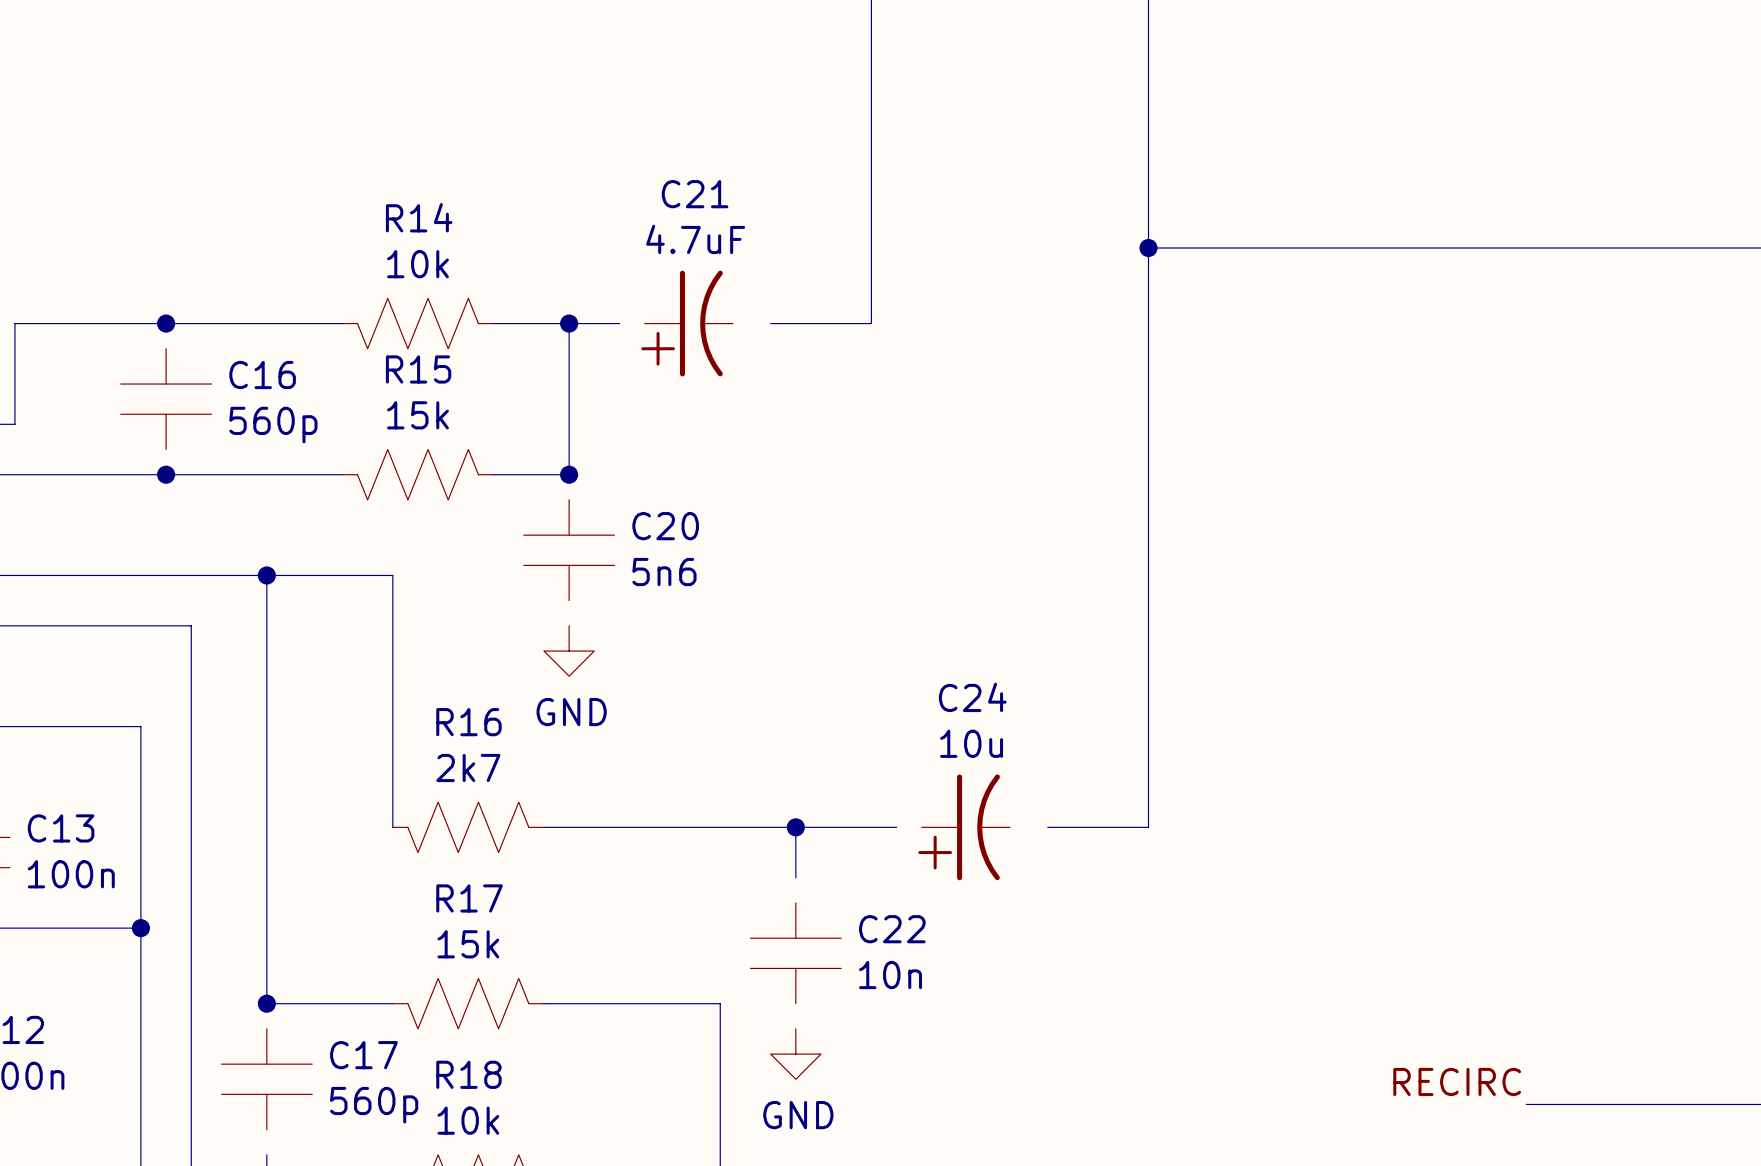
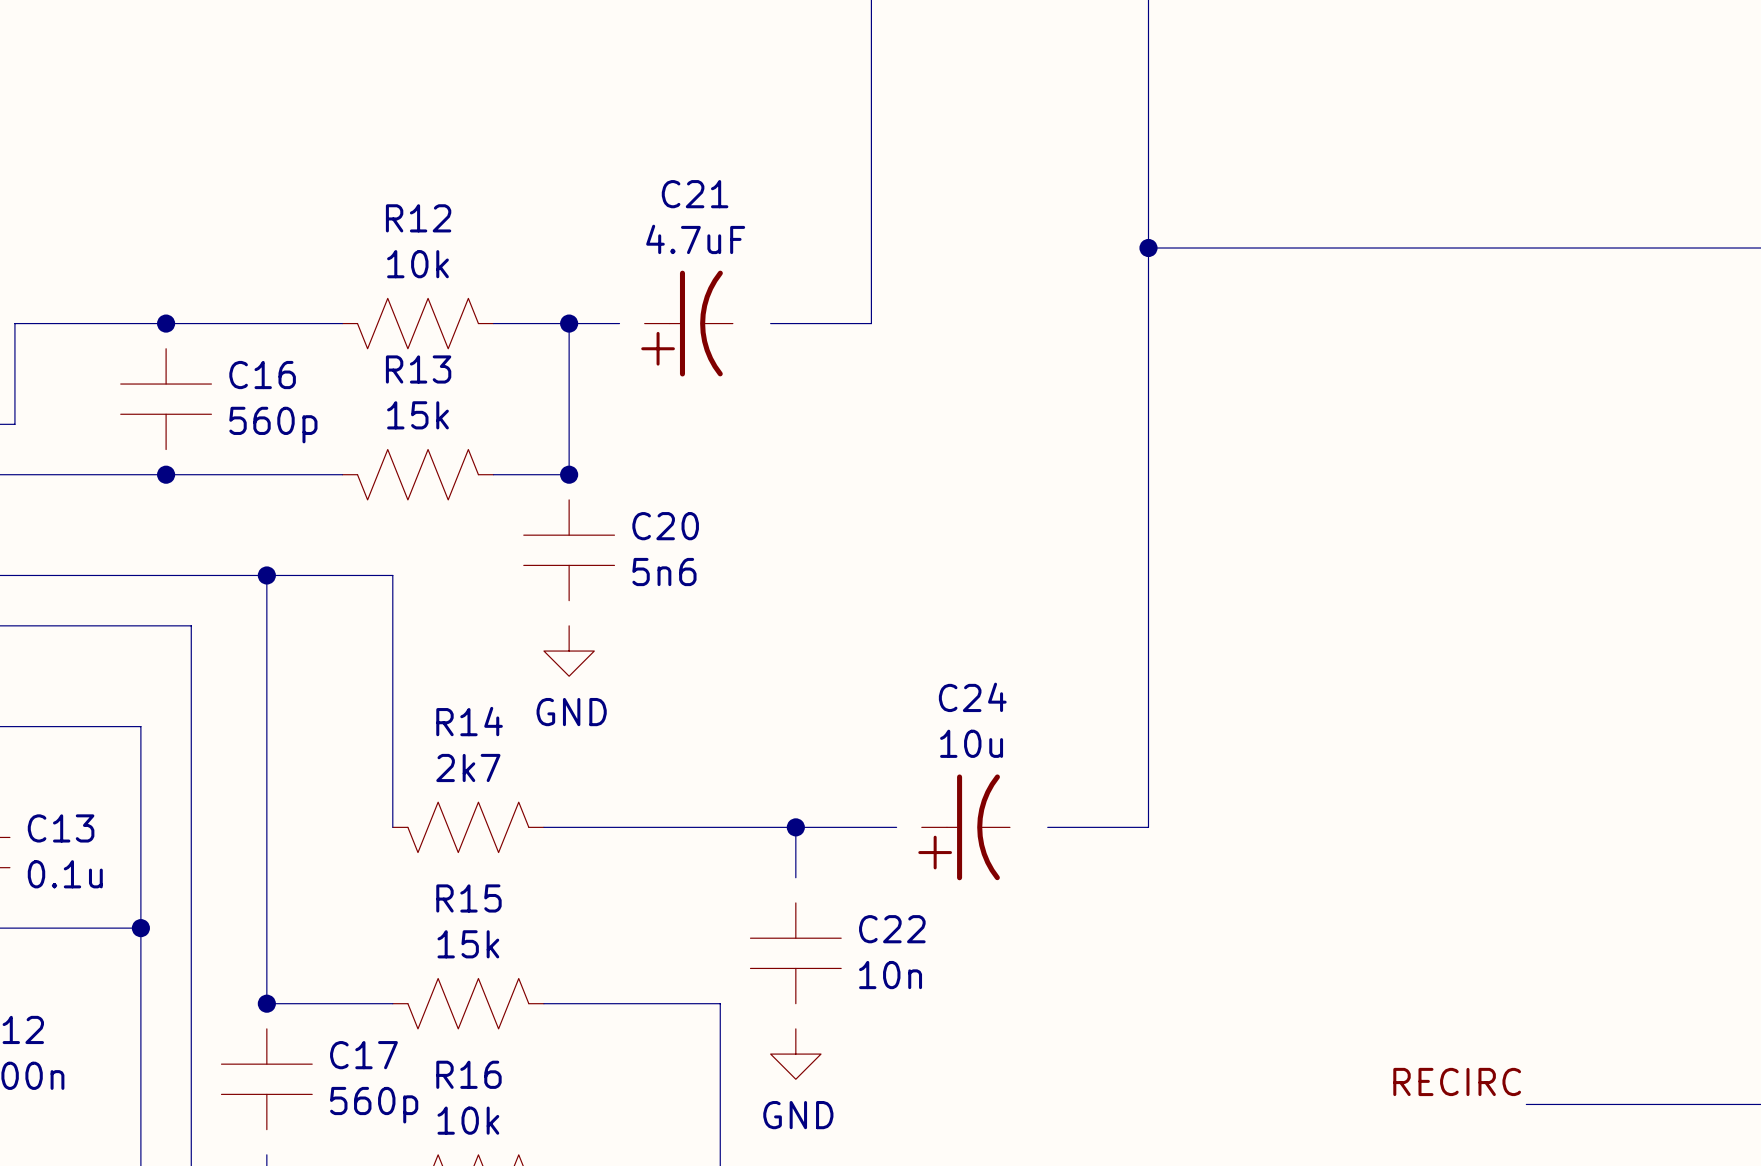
R14 name: R14 (419, 217) -> R12 (418, 218)
R15 name: R15 (418, 369) -> R13 (418, 369)
R16 name: R16 (468, 722) -> R14 (469, 721)
C13 value: 100n (71, 874) -> 0.1u (65, 874)
R17 name: R17 (469, 898) -> R15 (468, 898)
R18 name: R18 (468, 1074) -> R16 (468, 1074)

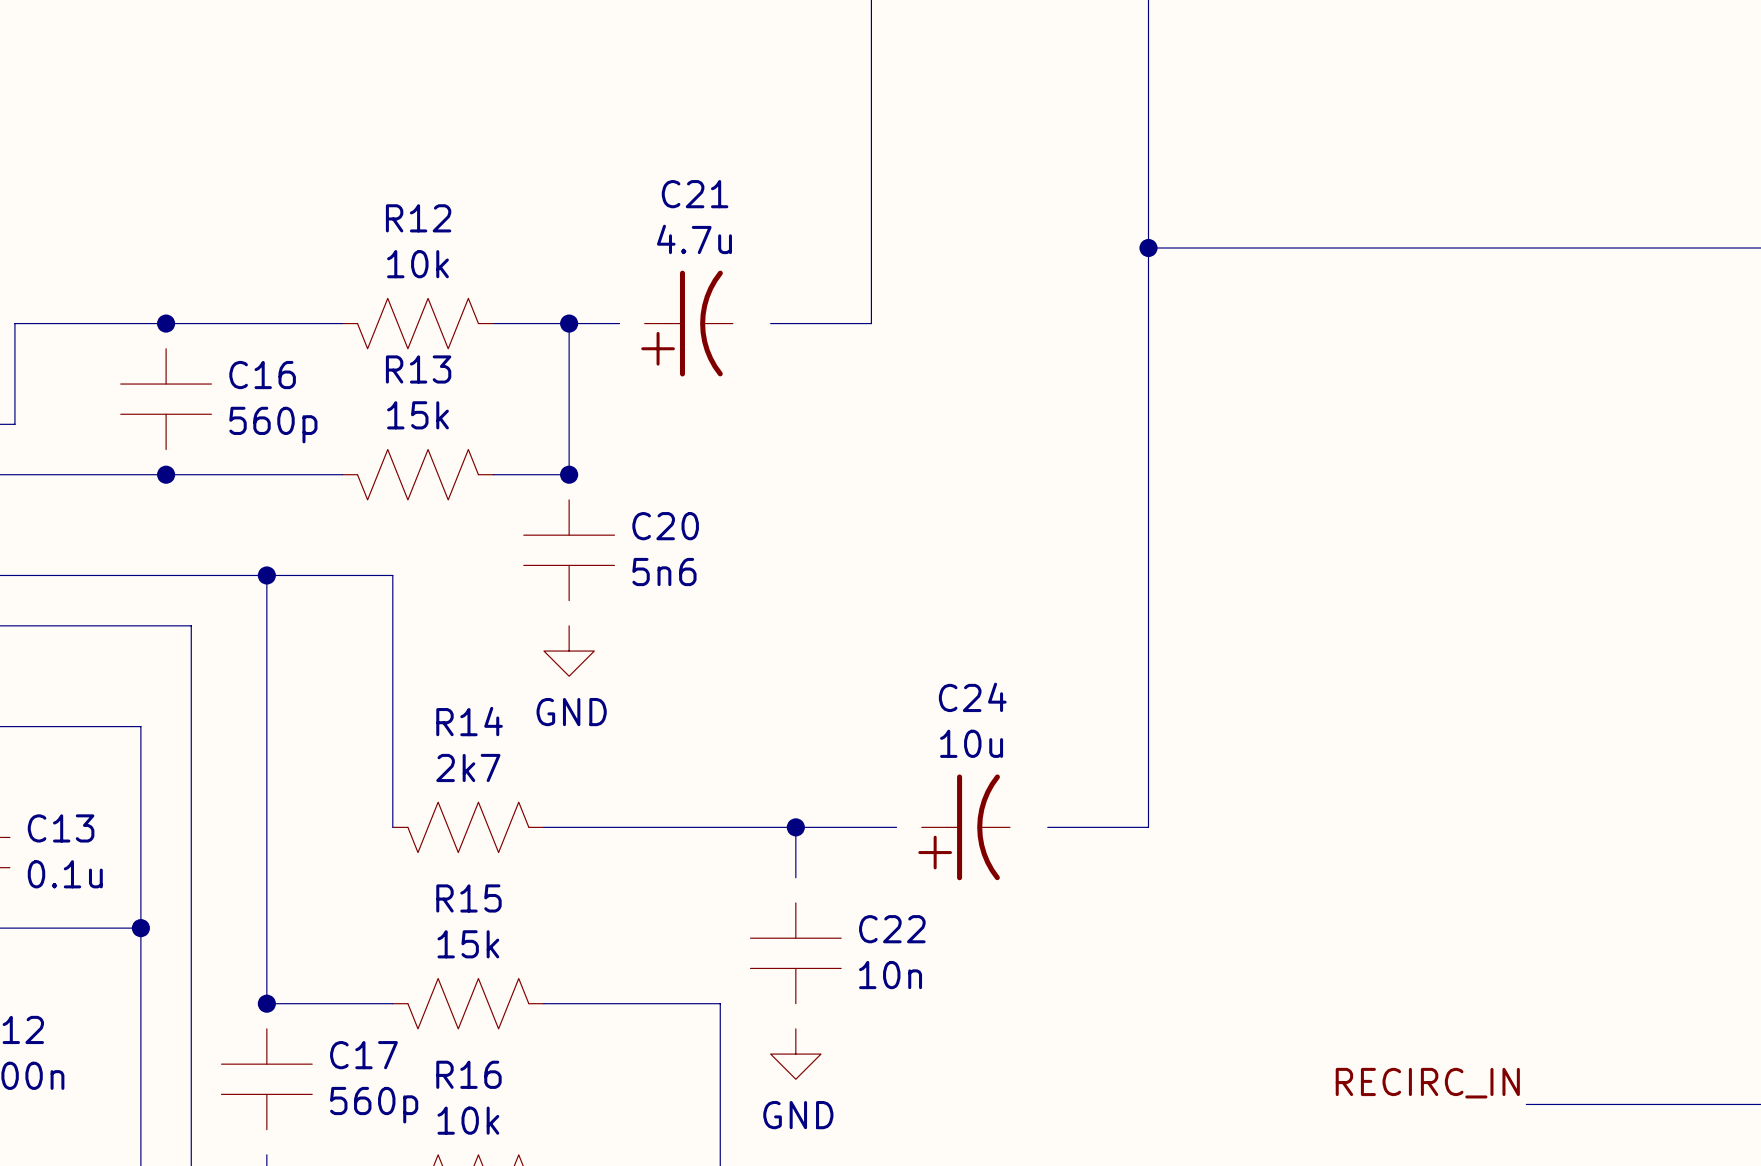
C21 value: 4.7uF (695, 239) -> 4.7u (694, 239)
label: RECIRC (1457, 1081) -> RECIRC_IN (1427, 1083)

